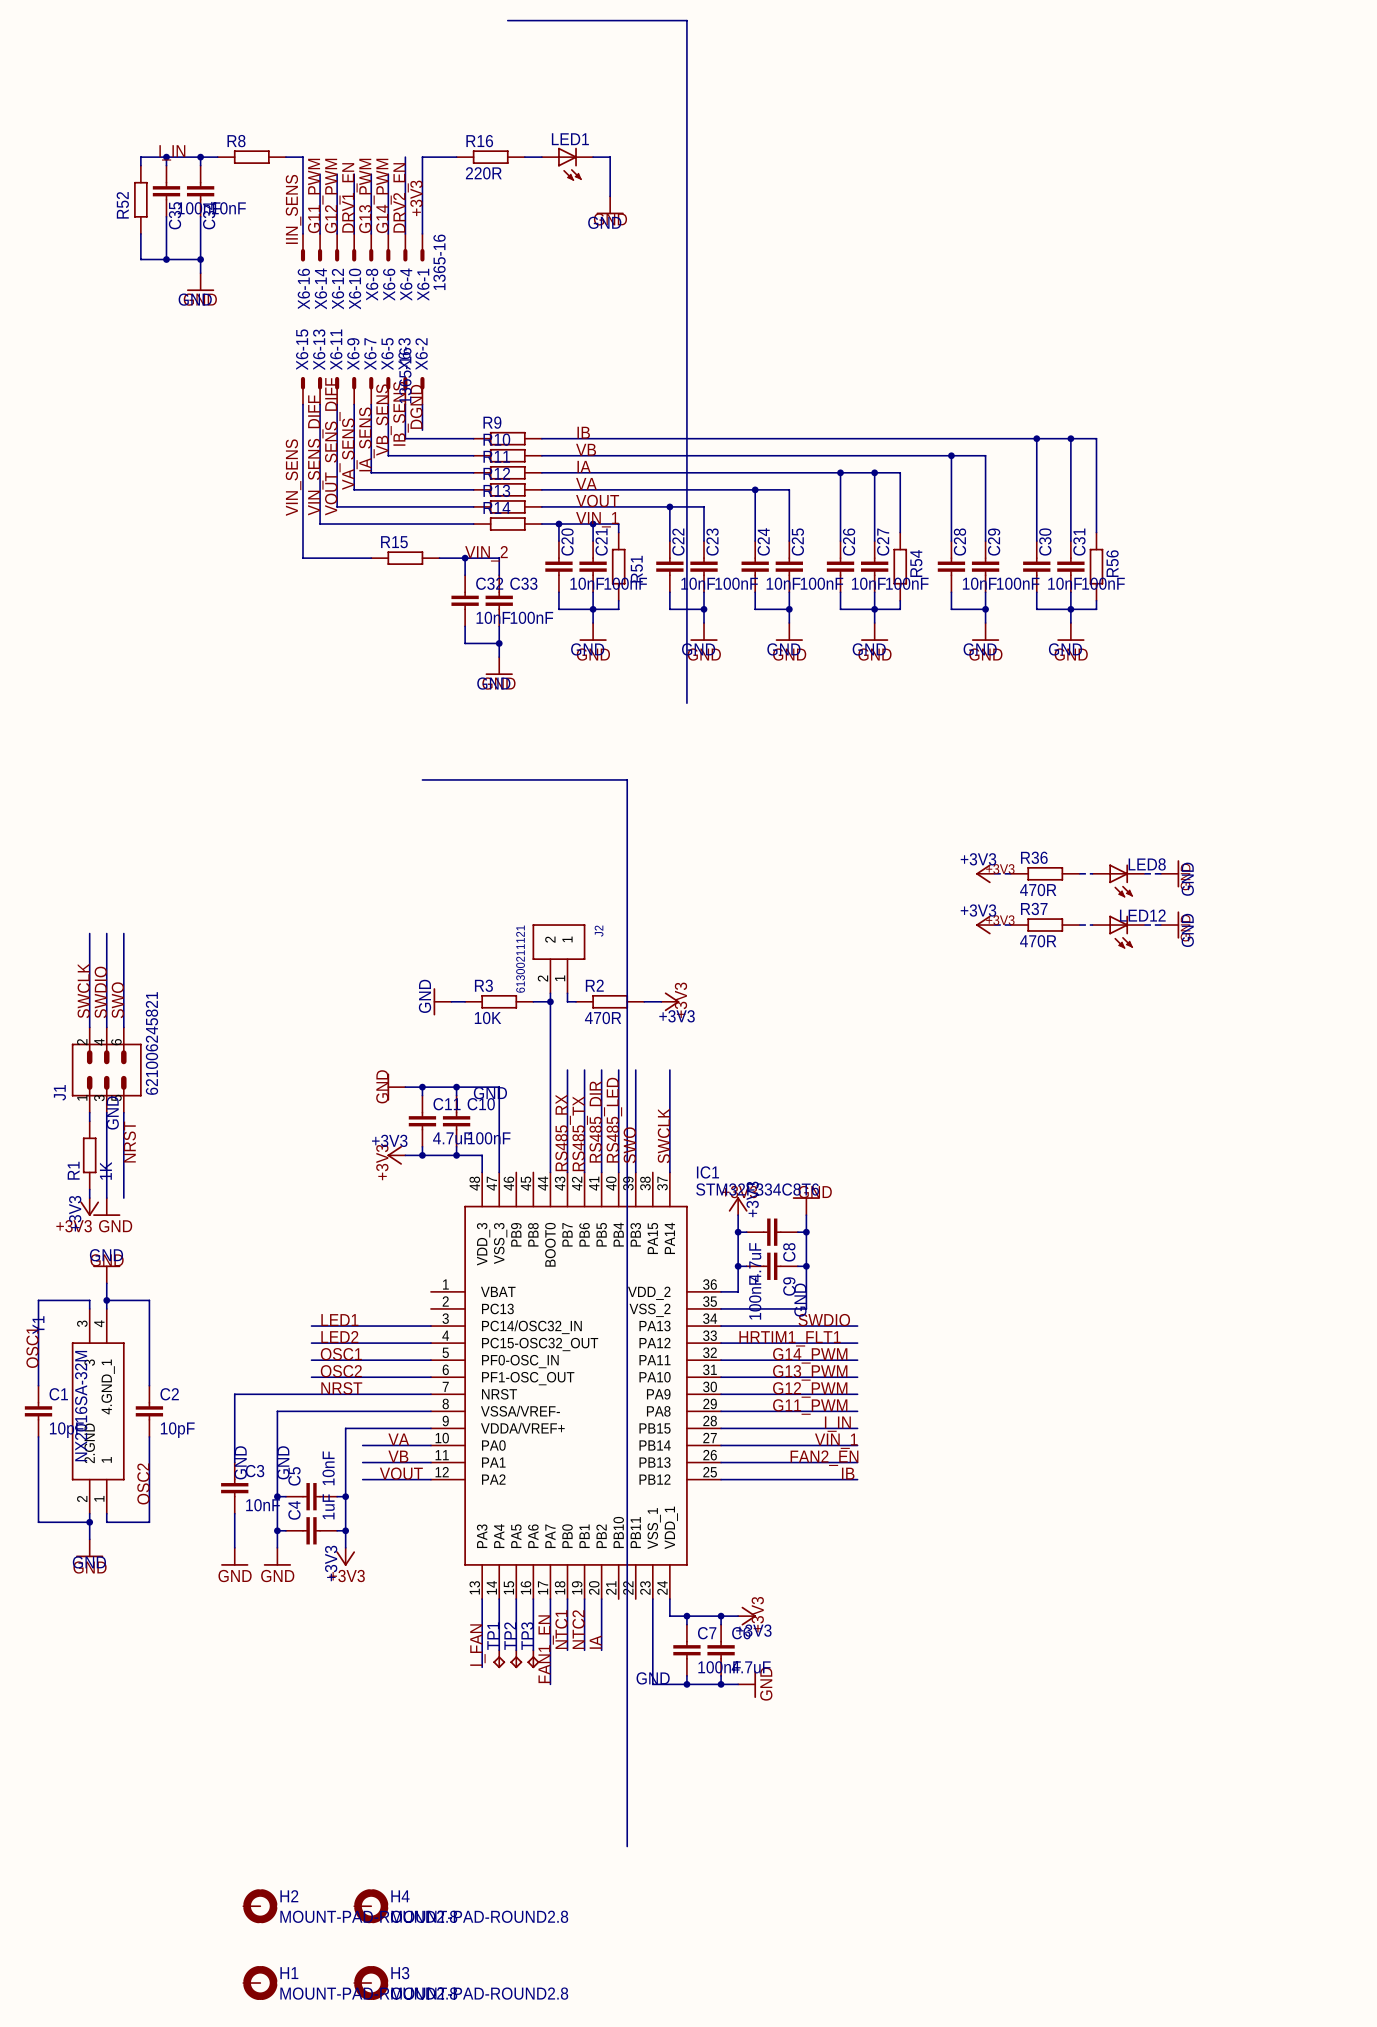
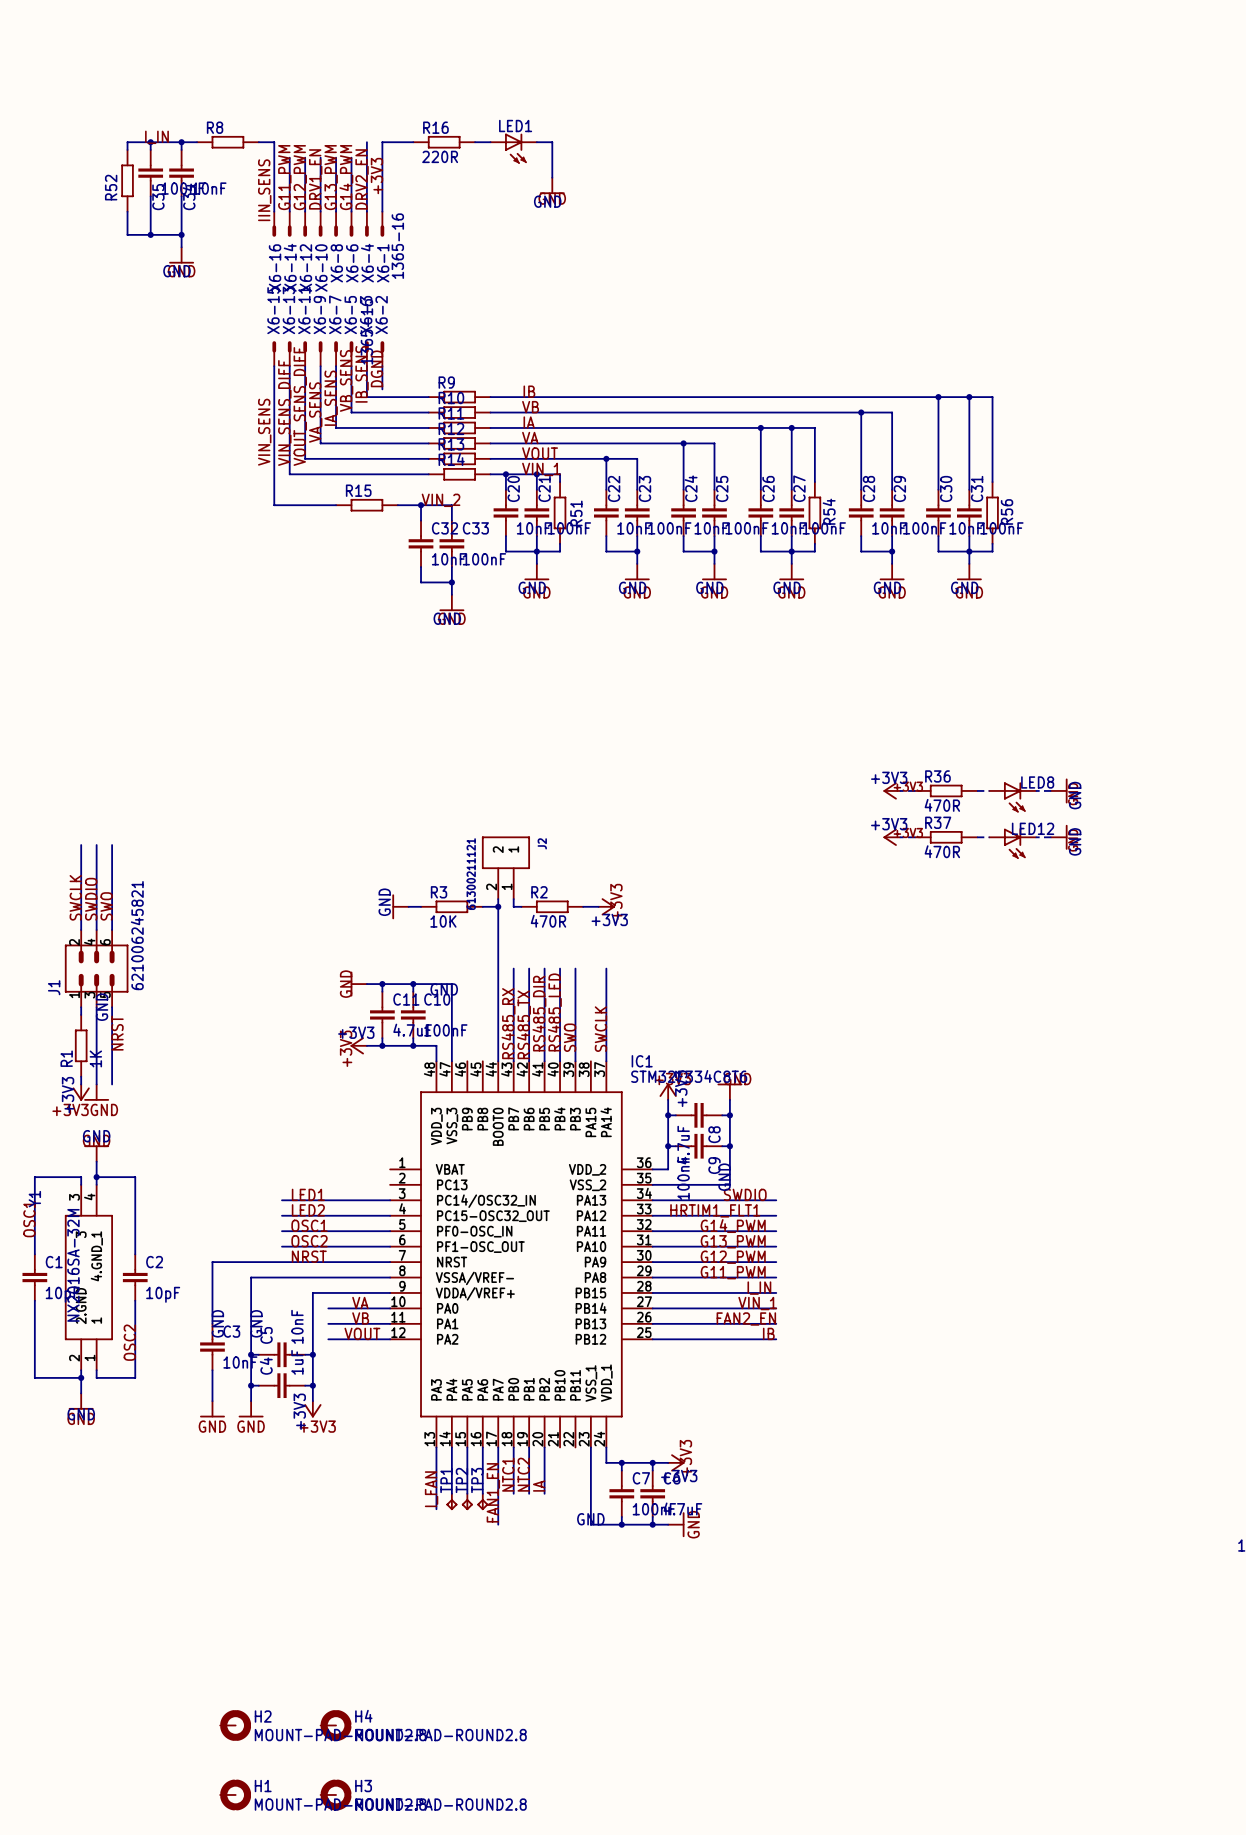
bus: (507, 20) (686, 20) (686, 703) -> none
bus: (422, 779) (627, 779) (627, 1846) -> none

